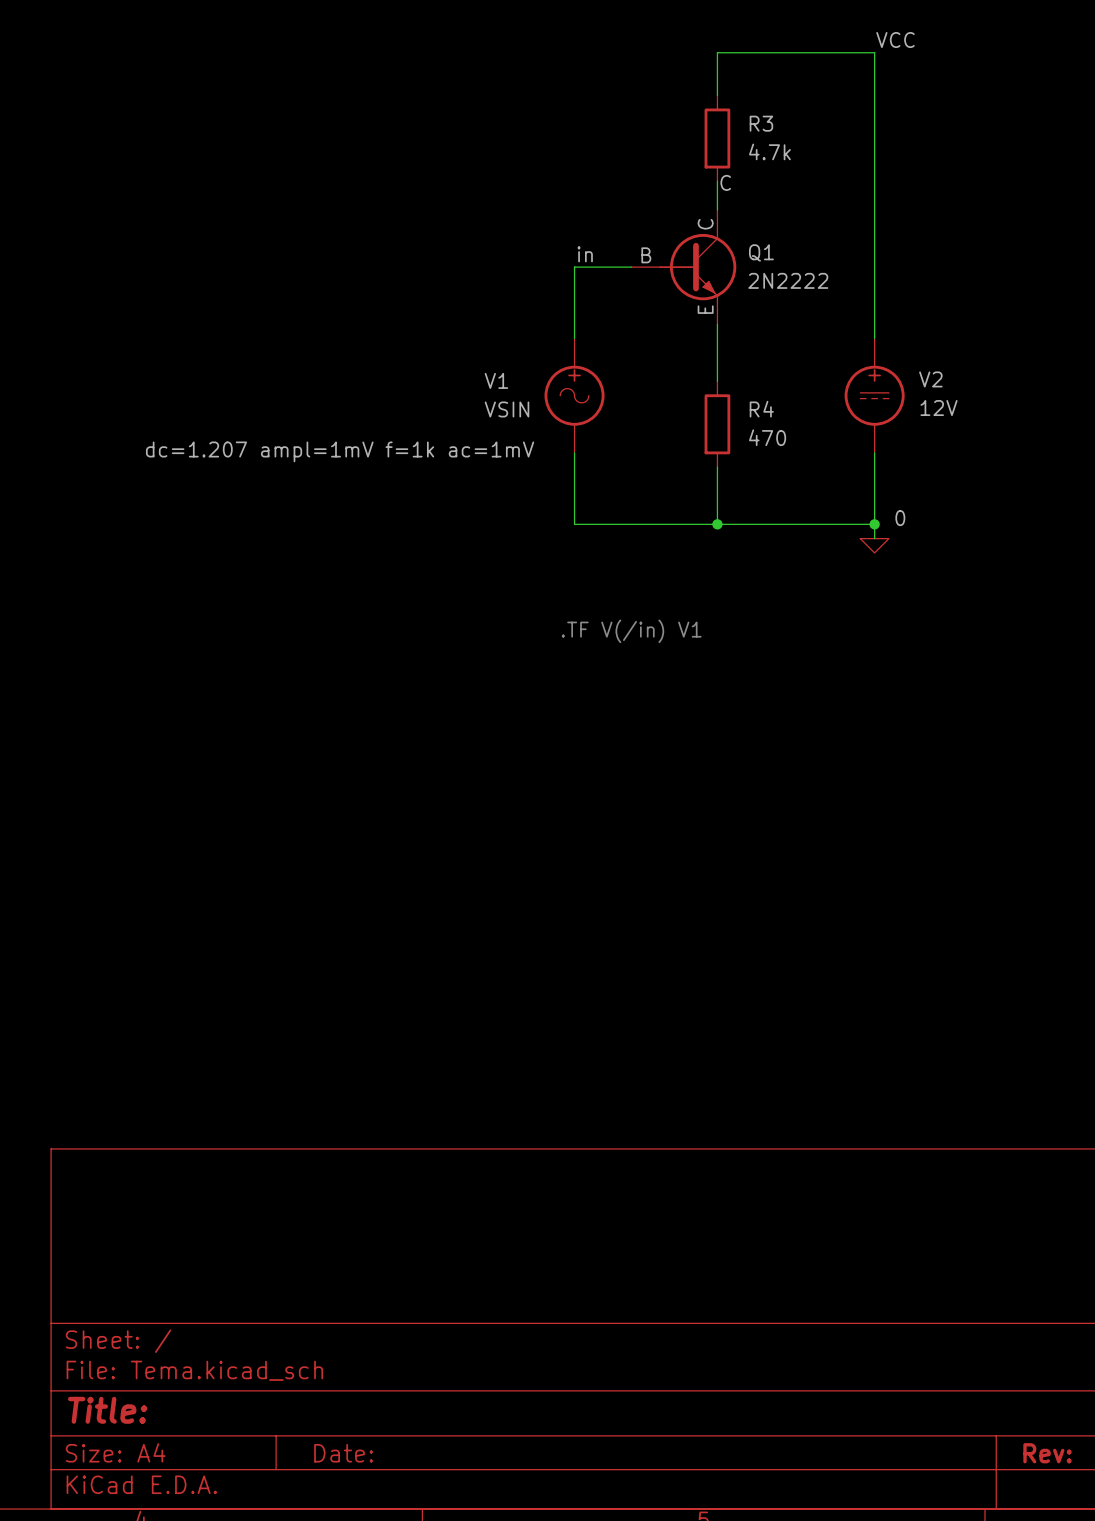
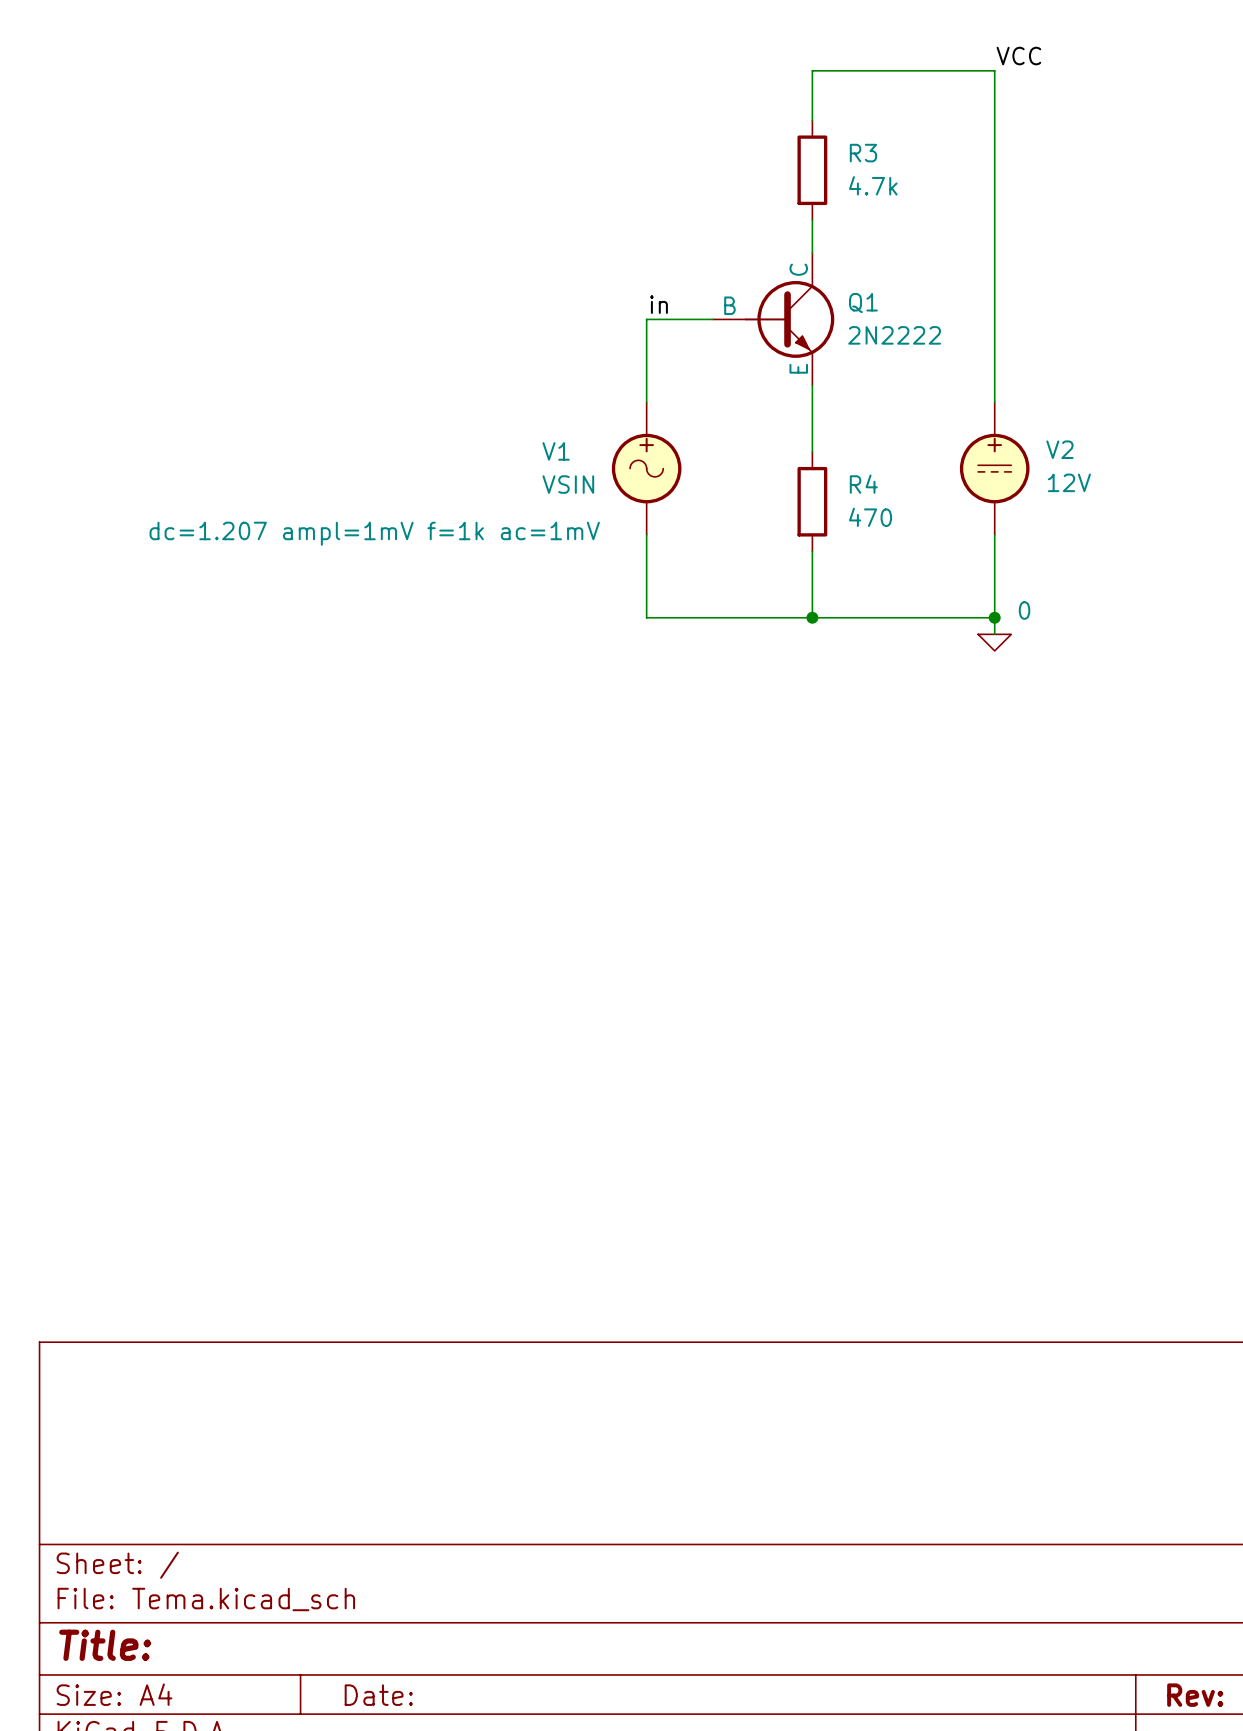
label: C (725, 182) -> none
text: .TF V(/in) V1 (631, 631) -> none

